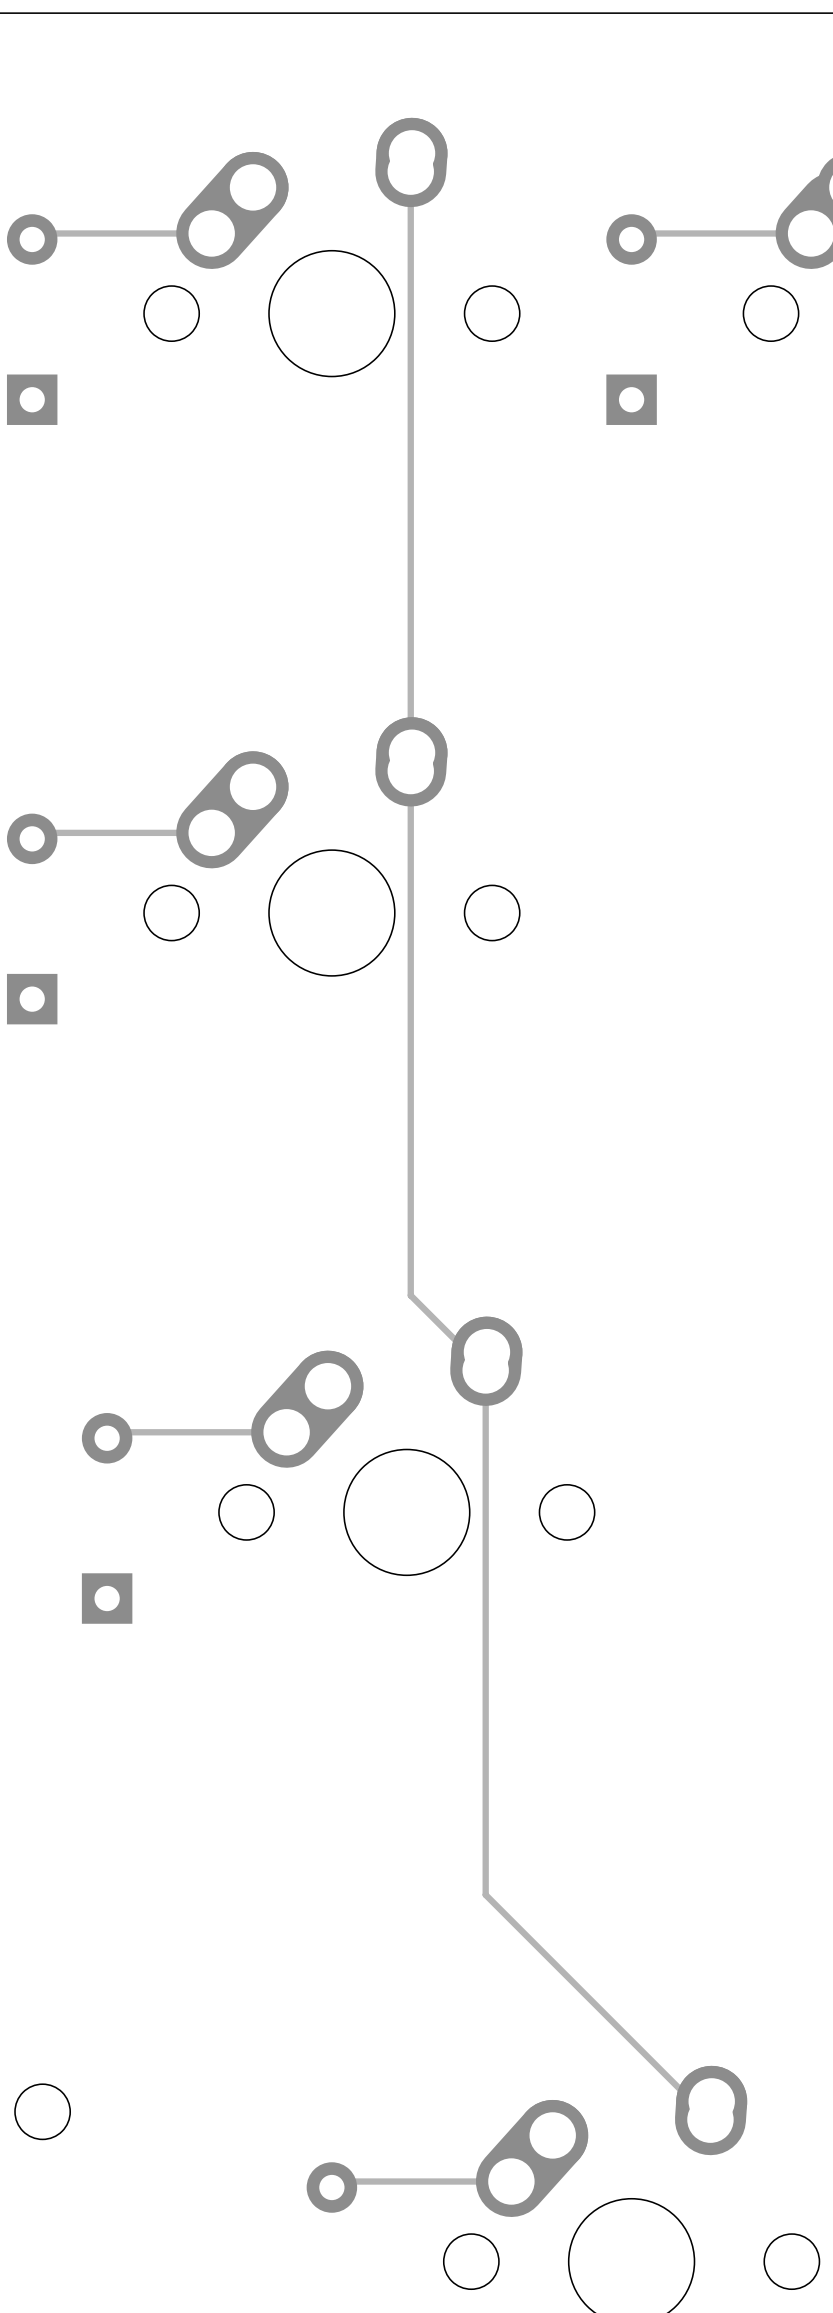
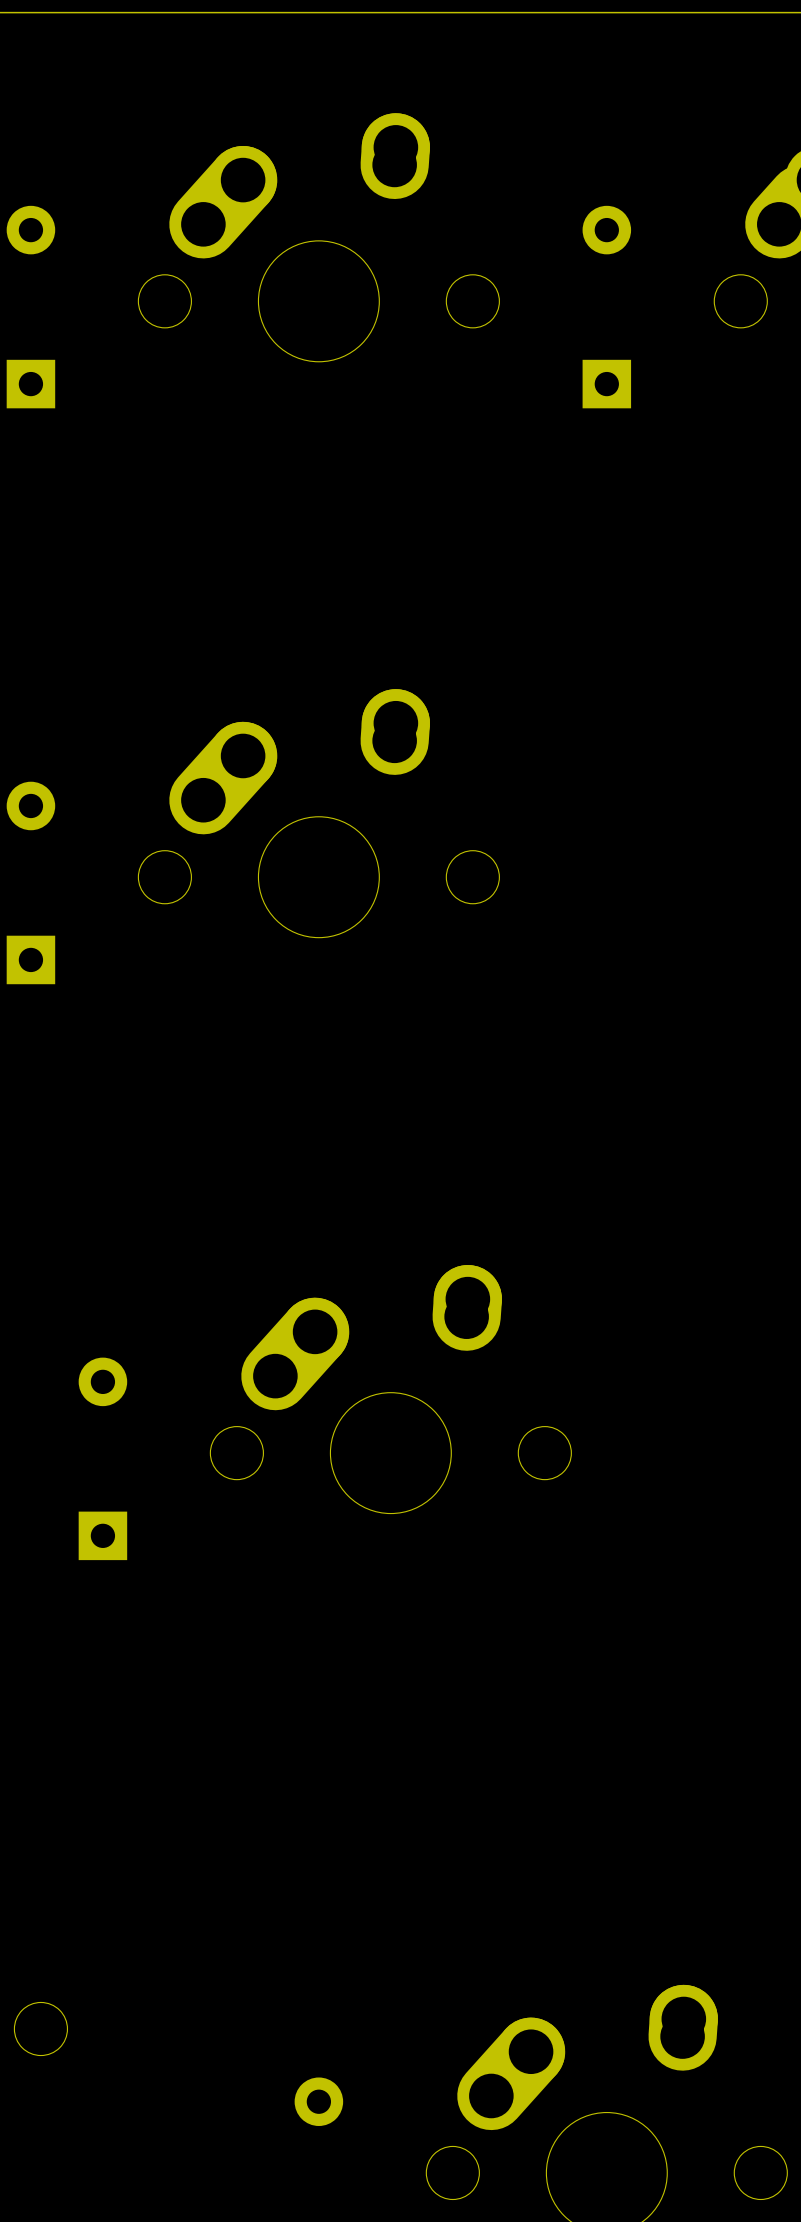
track: (410, 171) (410, 1295) (485, 1370) (485, 1894) (710, 2119) -> none
track: (211, 233) (38, 233) (32, 239) -> none
track: (811, 233) (637, 233) (631, 239) -> none
track: (211, 832) (38, 832) (32, 838) -> none
track: (286, 1432) (113, 1432) (107, 1438) -> none
track: (511, 2181) (337, 2181) (331, 2187) -> none

